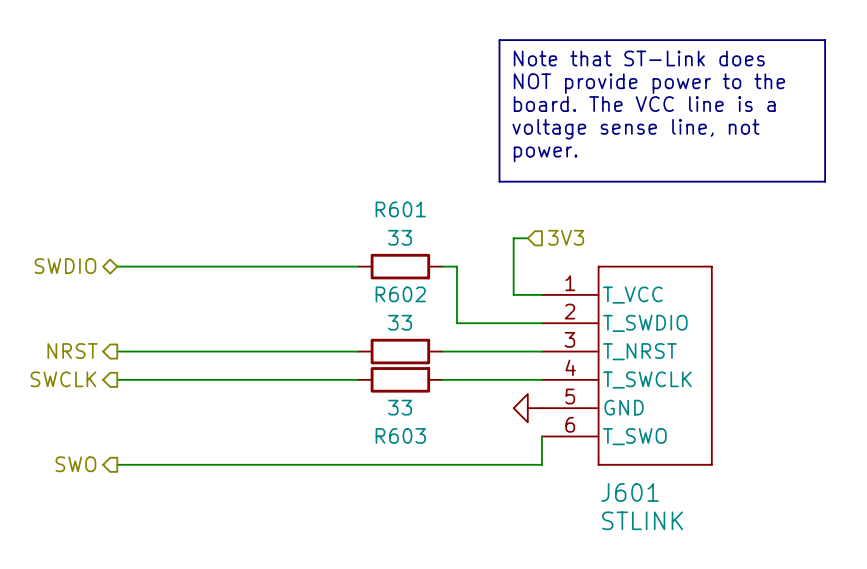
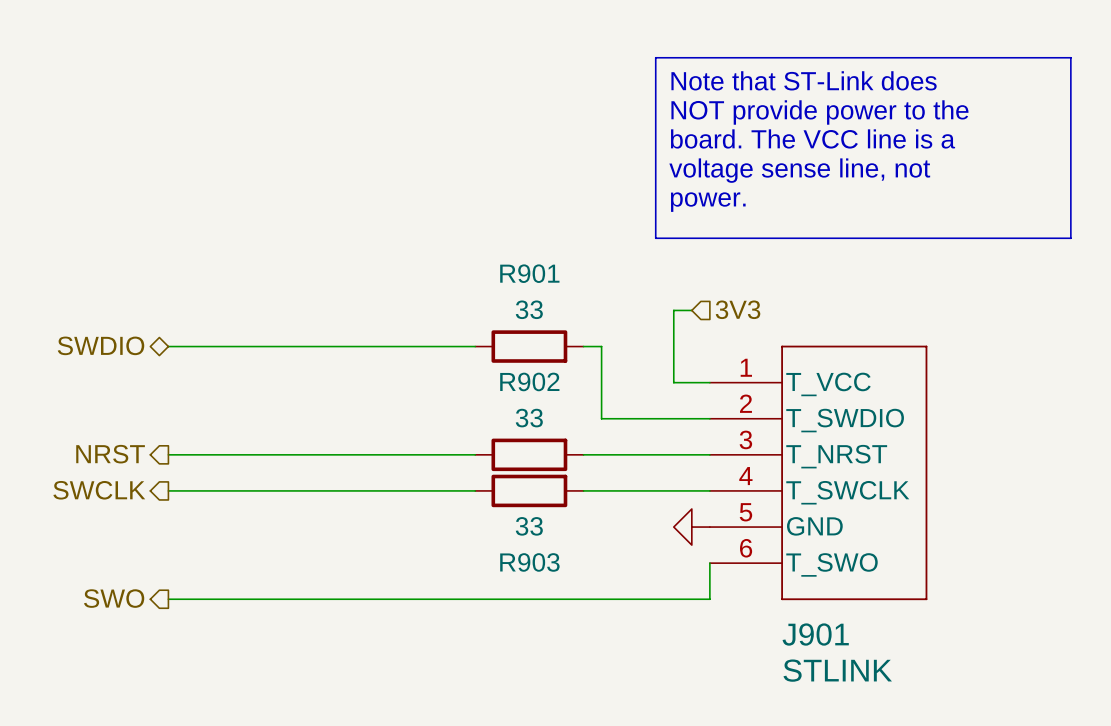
R601 name: R601 (400, 209) -> R901 (529, 273)
R602 name: R602 (400, 294) -> R902 (529, 381)
R603 name: R603 (400, 435) -> R903 (529, 562)
J601 name: J601 (630, 492) -> J901 (815, 634)

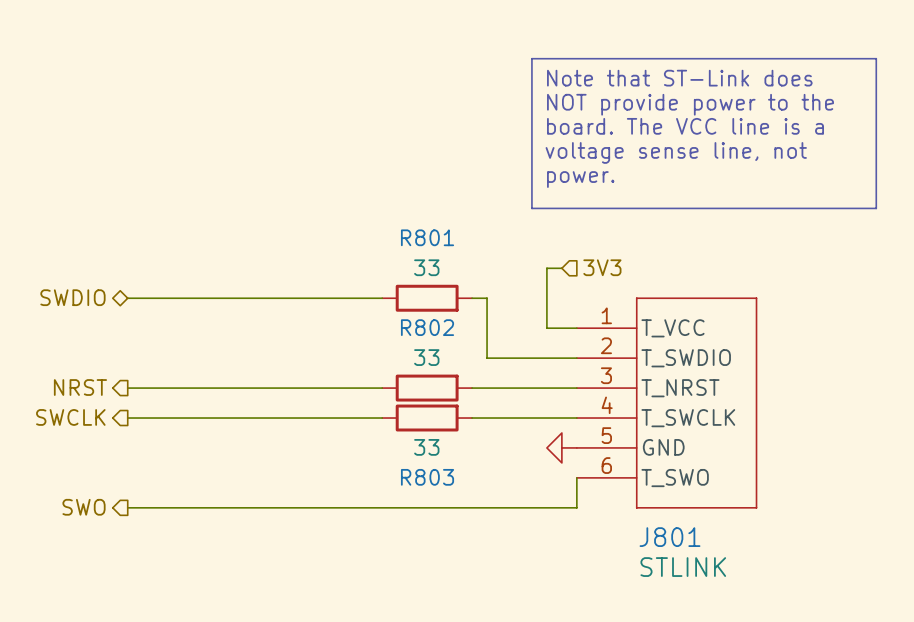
R901 name: R901 (529, 273) -> R801 (427, 237)
R902 name: R902 (529, 381) -> R802 (427, 327)
R903 name: R903 (529, 562) -> R803 (427, 477)
J901 name: J901 (815, 634) -> J801 (670, 537)

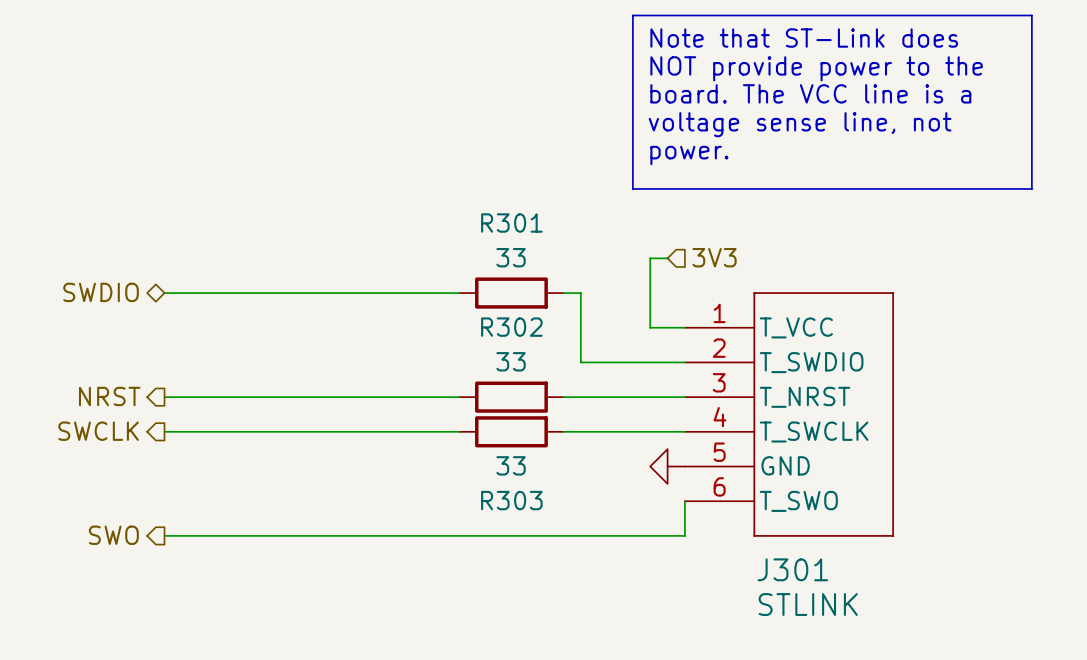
R801 name: R801 (427, 237) -> R301 (511, 223)
R802 name: R802 (427, 327) -> R302 (511, 327)
R803 name: R803 (427, 477) -> R303 (511, 500)
J801 name: J801 (670, 537) -> J301 (792, 569)

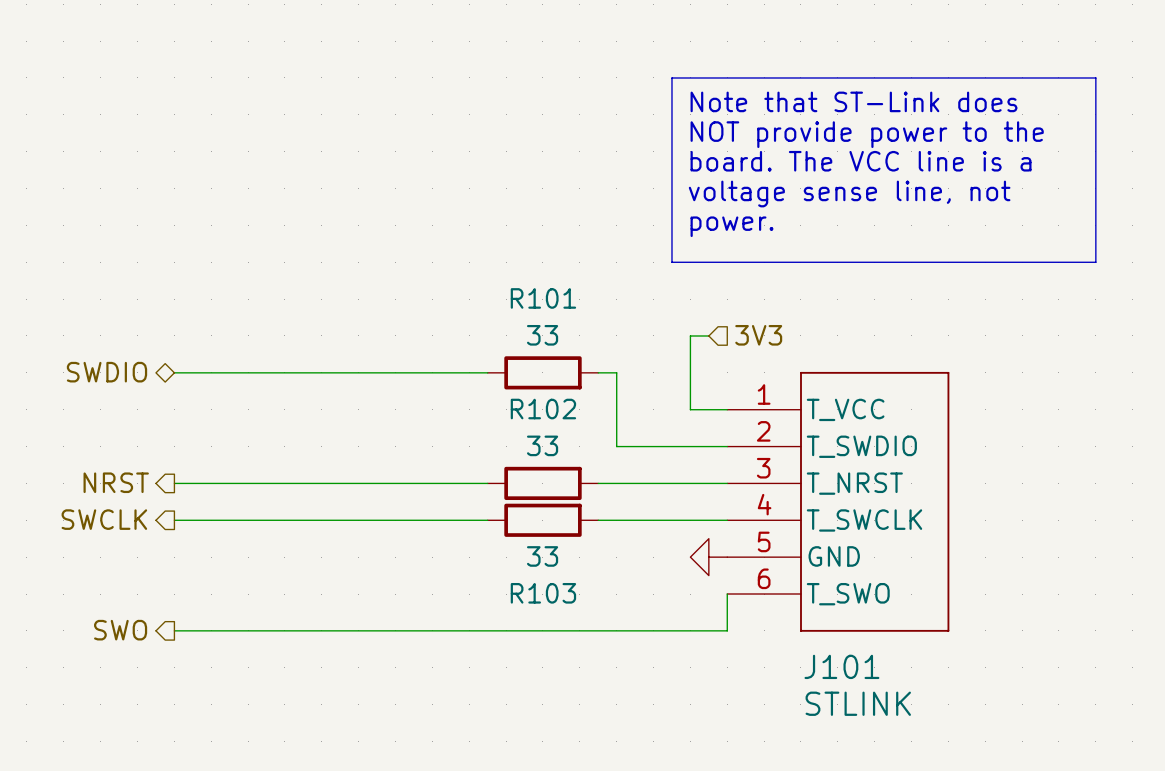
R301 name: R301 (511, 223) -> R101 (543, 298)
R302 name: R302 (511, 327) -> R102 (543, 409)
R303 name: R303 (511, 500) -> R103 (543, 593)
J301 name: J301 (792, 569) -> J101 (841, 666)

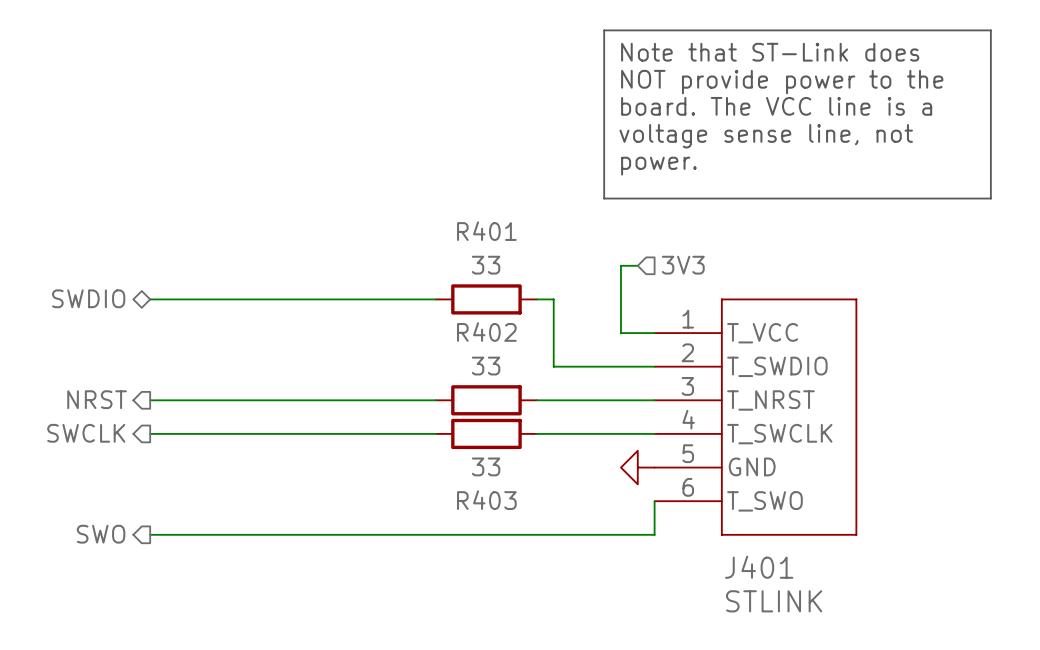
R101 name: R101 (543, 298) -> R401 (486, 231)
R102 name: R102 (543, 409) -> R402 (486, 332)
R103 name: R103 (543, 593) -> R403 (486, 500)
J101 name: J101 (841, 666) -> J401 (759, 567)

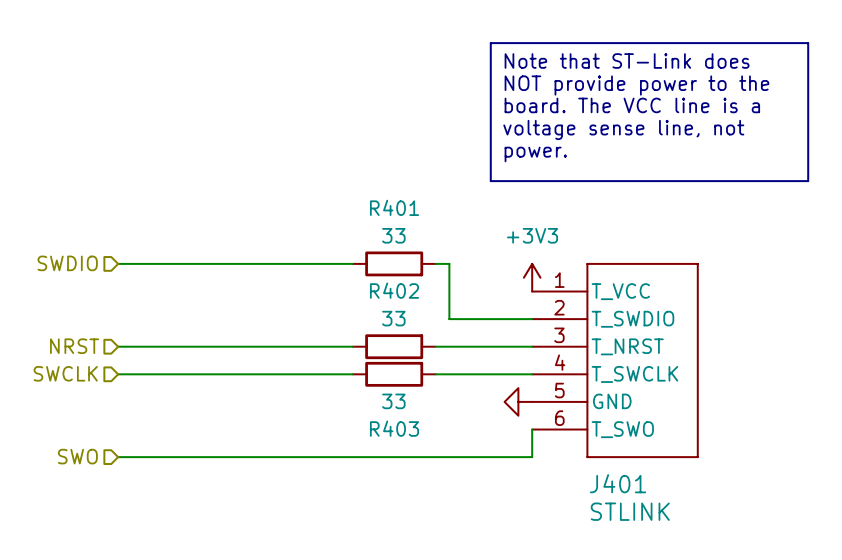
wire: (637, 265) (620, 265) (620, 333) (654, 333) -> none
hierarchical label: 3V3 (683, 265) -> none
hierarchical label shape: bidirectional (88, 298) -> input (67, 263)
power symbol: none -> +3V3 (532, 277)
hierarchical label shape: output (97, 399) -> input (74, 346)
hierarchical label shape: output (86, 433) -> input (65, 373)
hierarchical label shape: output (101, 534) -> input (77, 456)

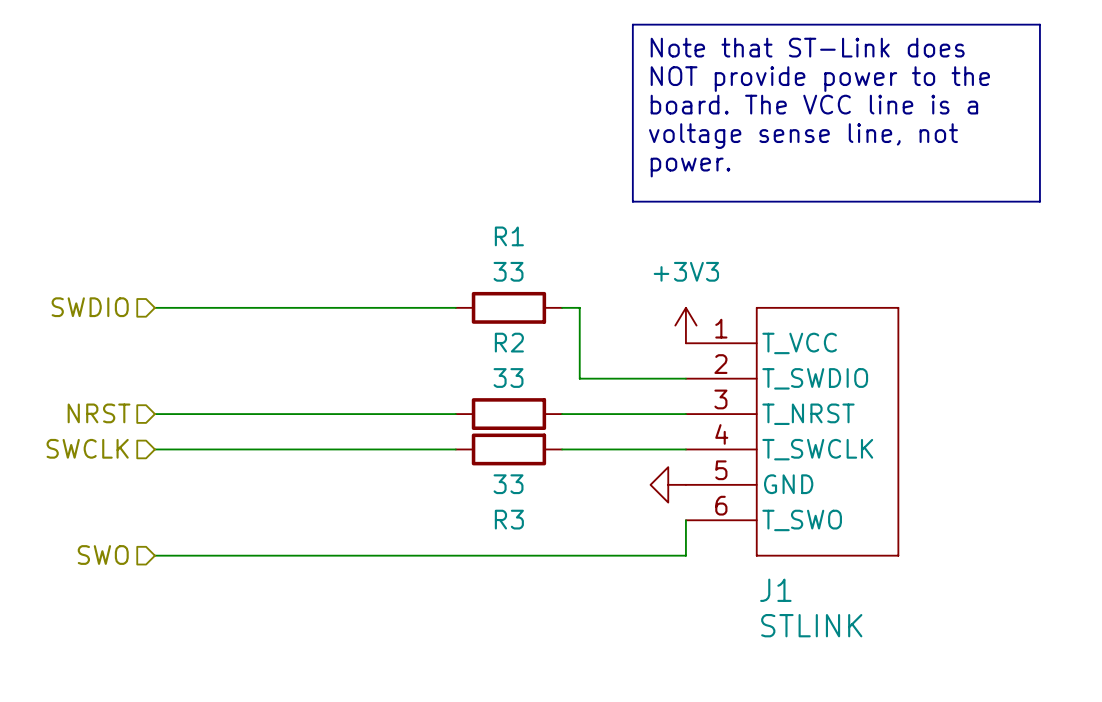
R401 name: R401 (394, 207) -> R1 (509, 236)
R402 name: R402 (394, 290) -> R2 (509, 342)
R403 name: R403 (394, 428) -> R3 (509, 519)
J401 name: J401 (618, 483) -> J1 (775, 590)

